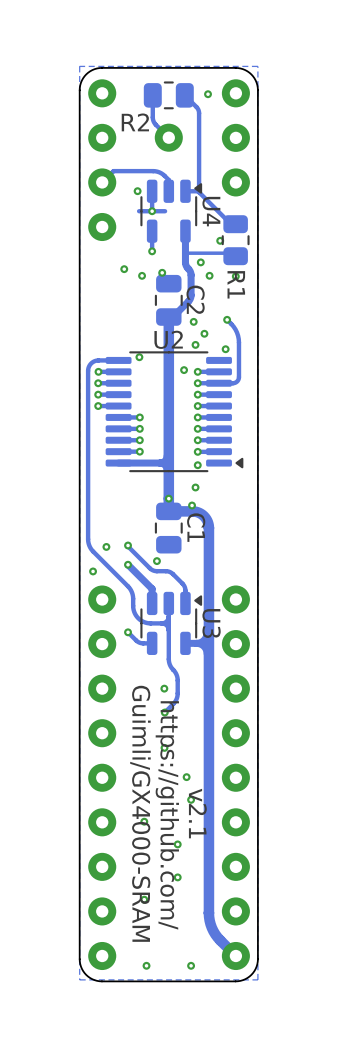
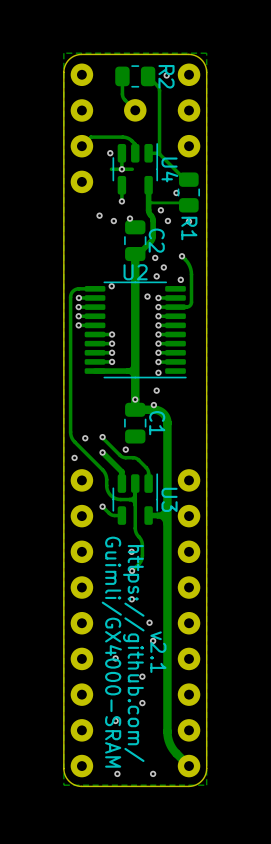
R2 name rotation: 0° (135, 122) -> 90° clockwise (166, 76)
R2 name position: R2 (135, 122) -> R2 (166, 76)
U4 footprint: [140, 179, 203, 243] -> [112, 143, 159, 195]
U2 footprint: [105, 351, 244, 473] -> [84, 281, 187, 379]
U3 footprint: [140, 591, 203, 655] -> [112, 473, 159, 525]

